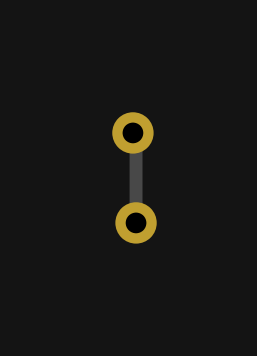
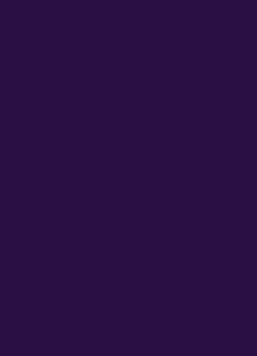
track: (132, 132) (136, 136) (136, 222) -> none
via: (132, 132) -> none
via: (136, 222) -> none

